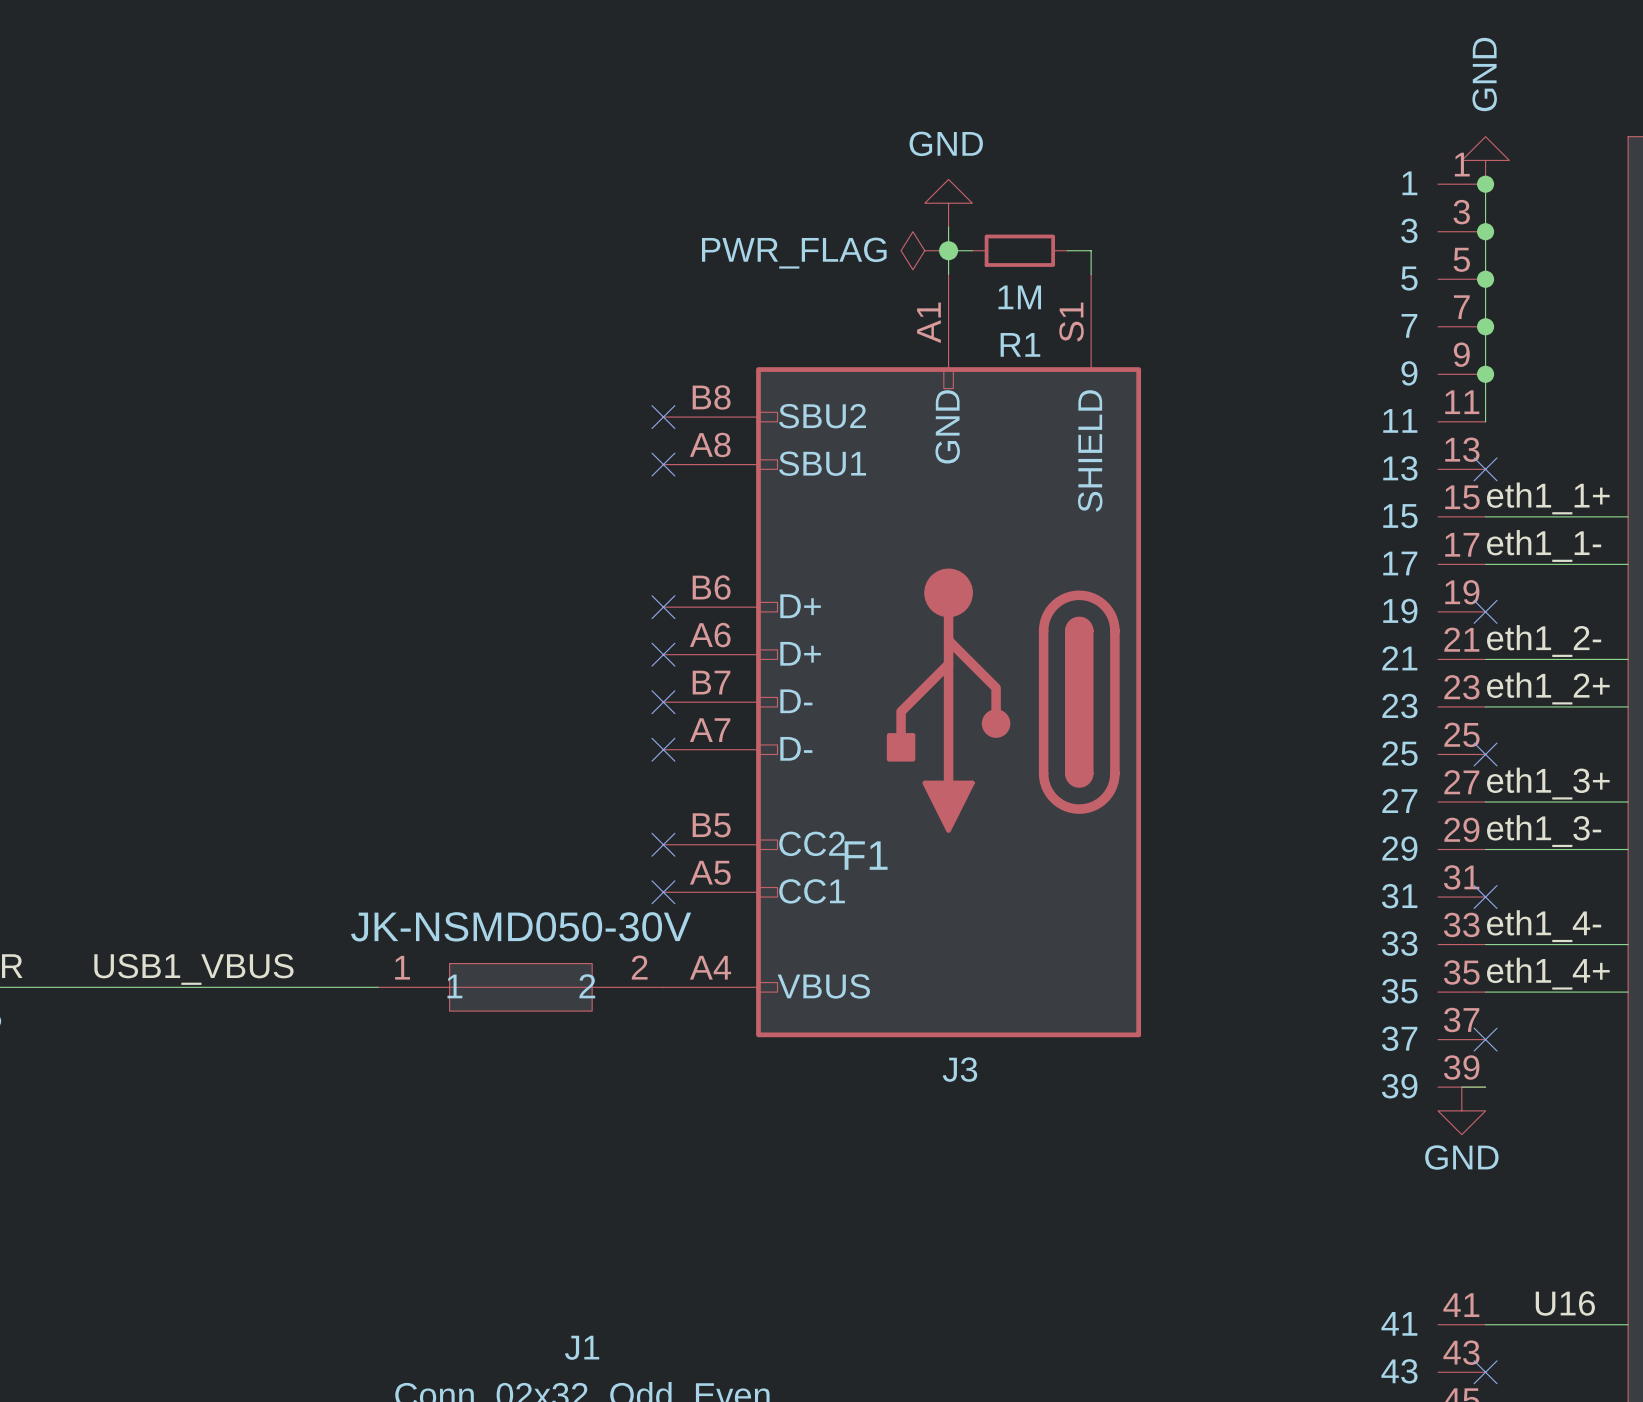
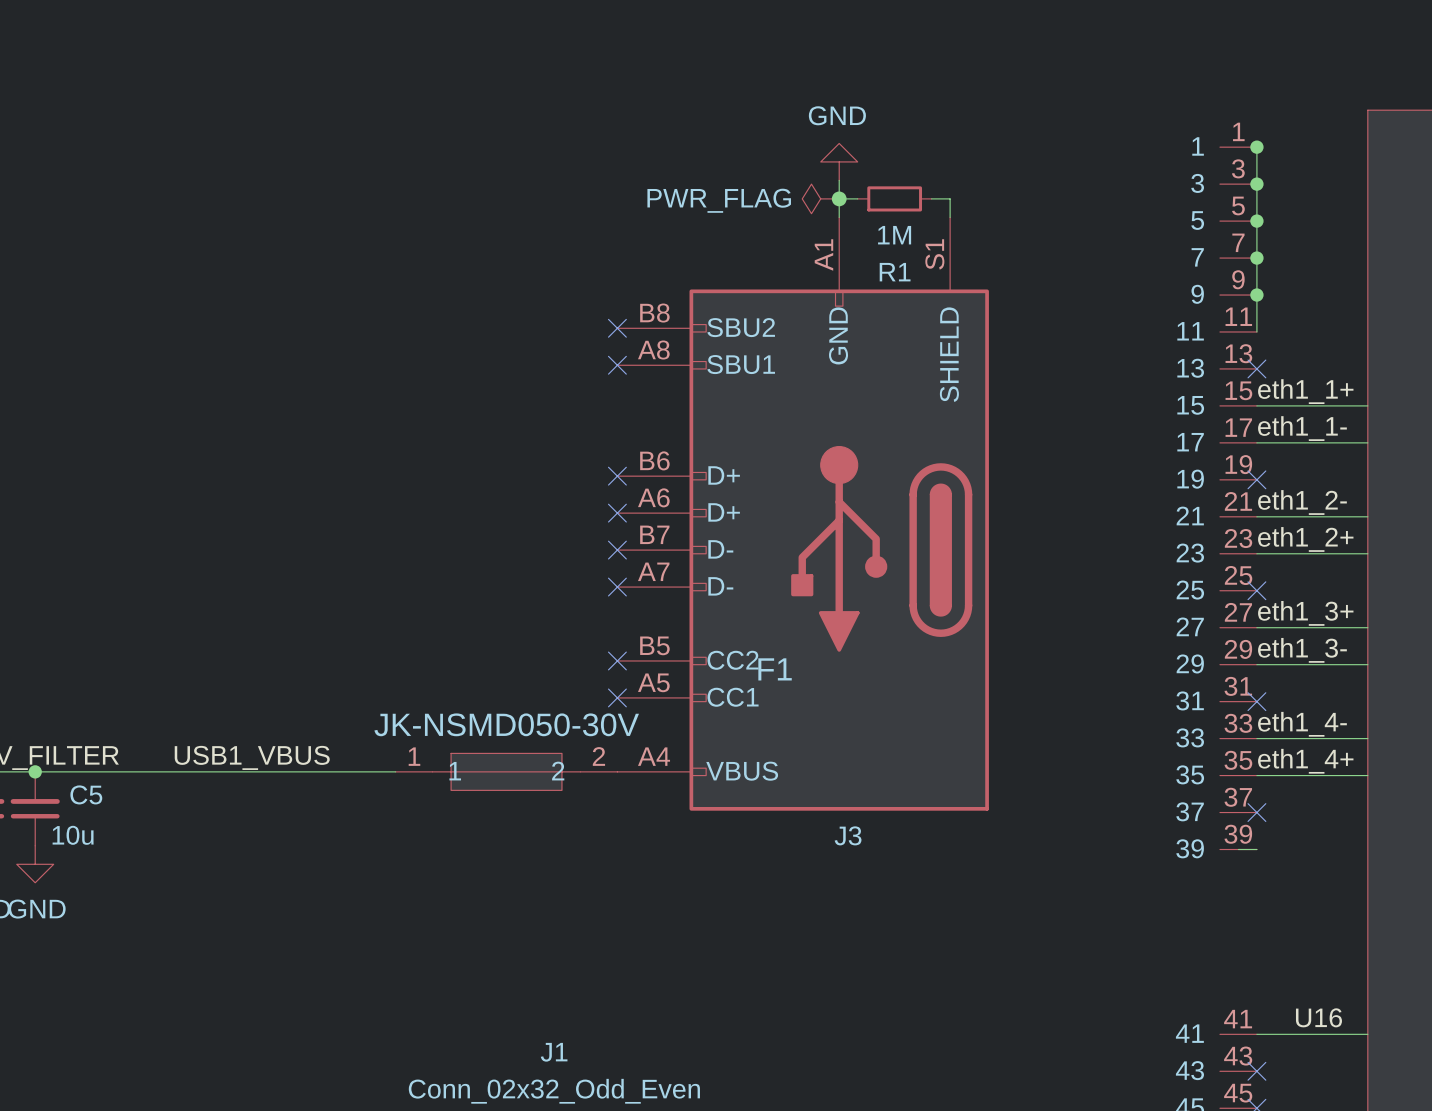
power symbol: GND (1485, 160) -> none
power symbol: GND (1461, 1110) -> none

